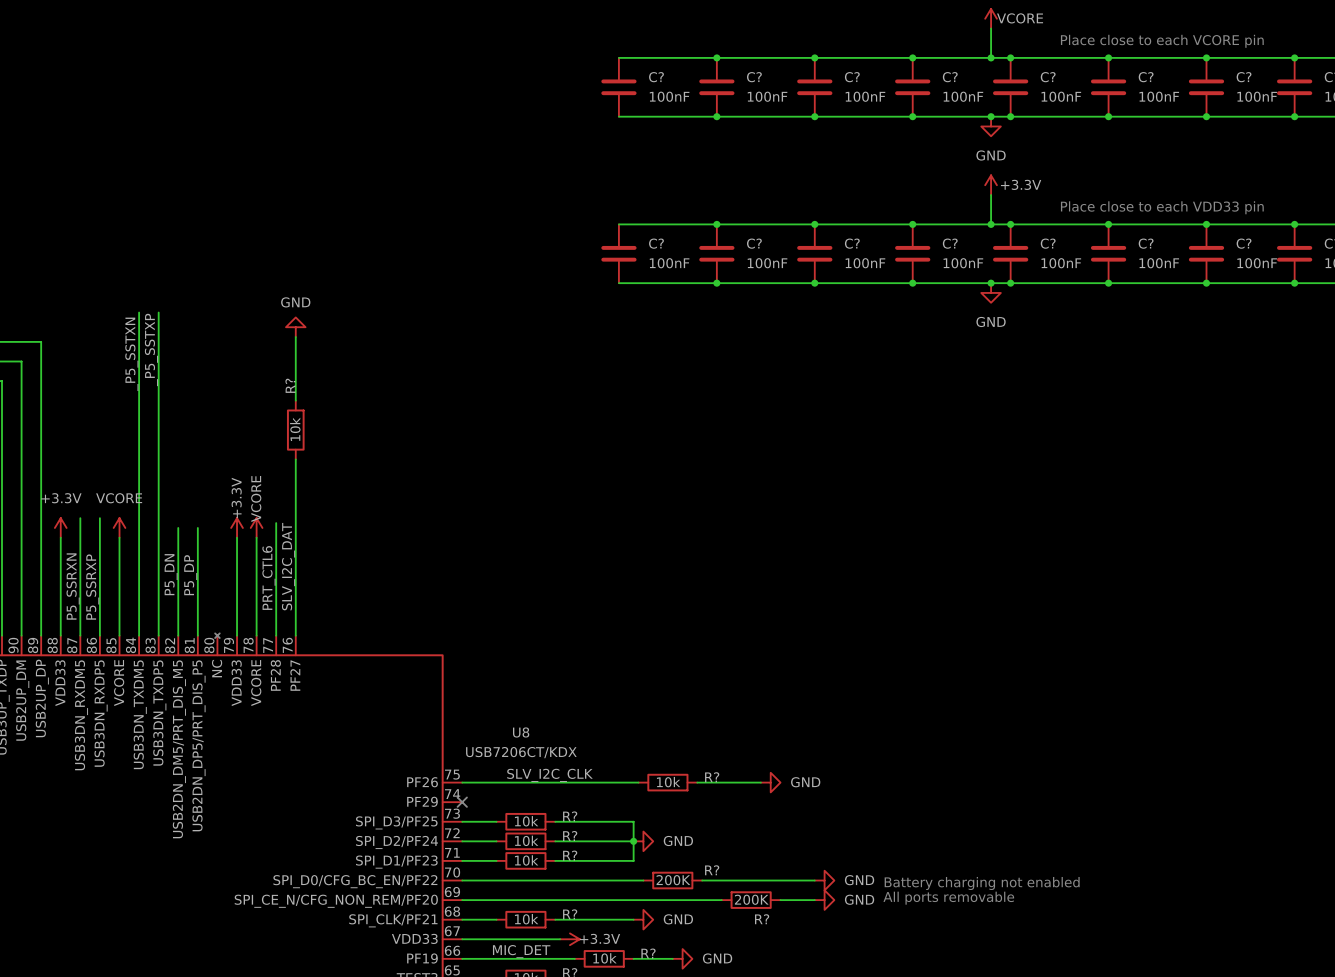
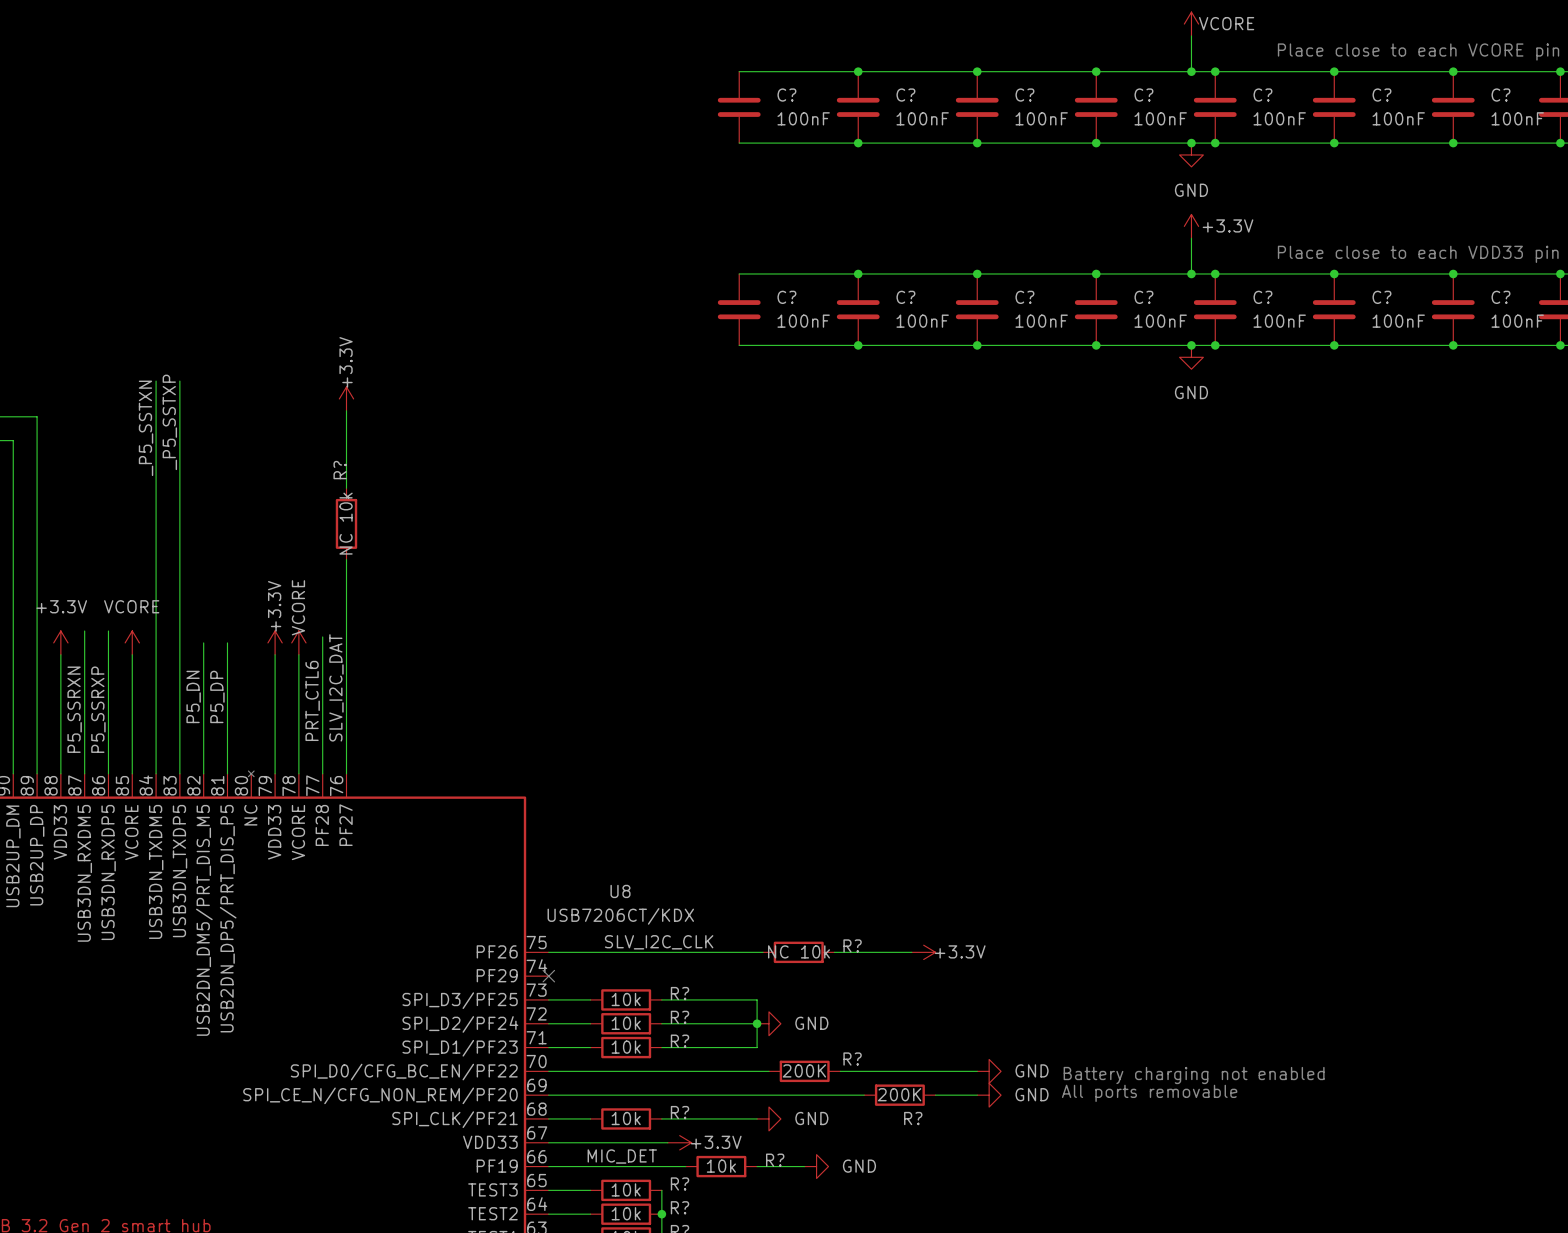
power symbol: GND (295, 327) -> +3.3V (346, 398)
R? value: 10k (295, 429) -> NC 10k (346, 523)
R? value: 10k (668, 782) -> NC 10k (799, 951)
power symbol: GND (770, 782) -> +3.3V (923, 952)

